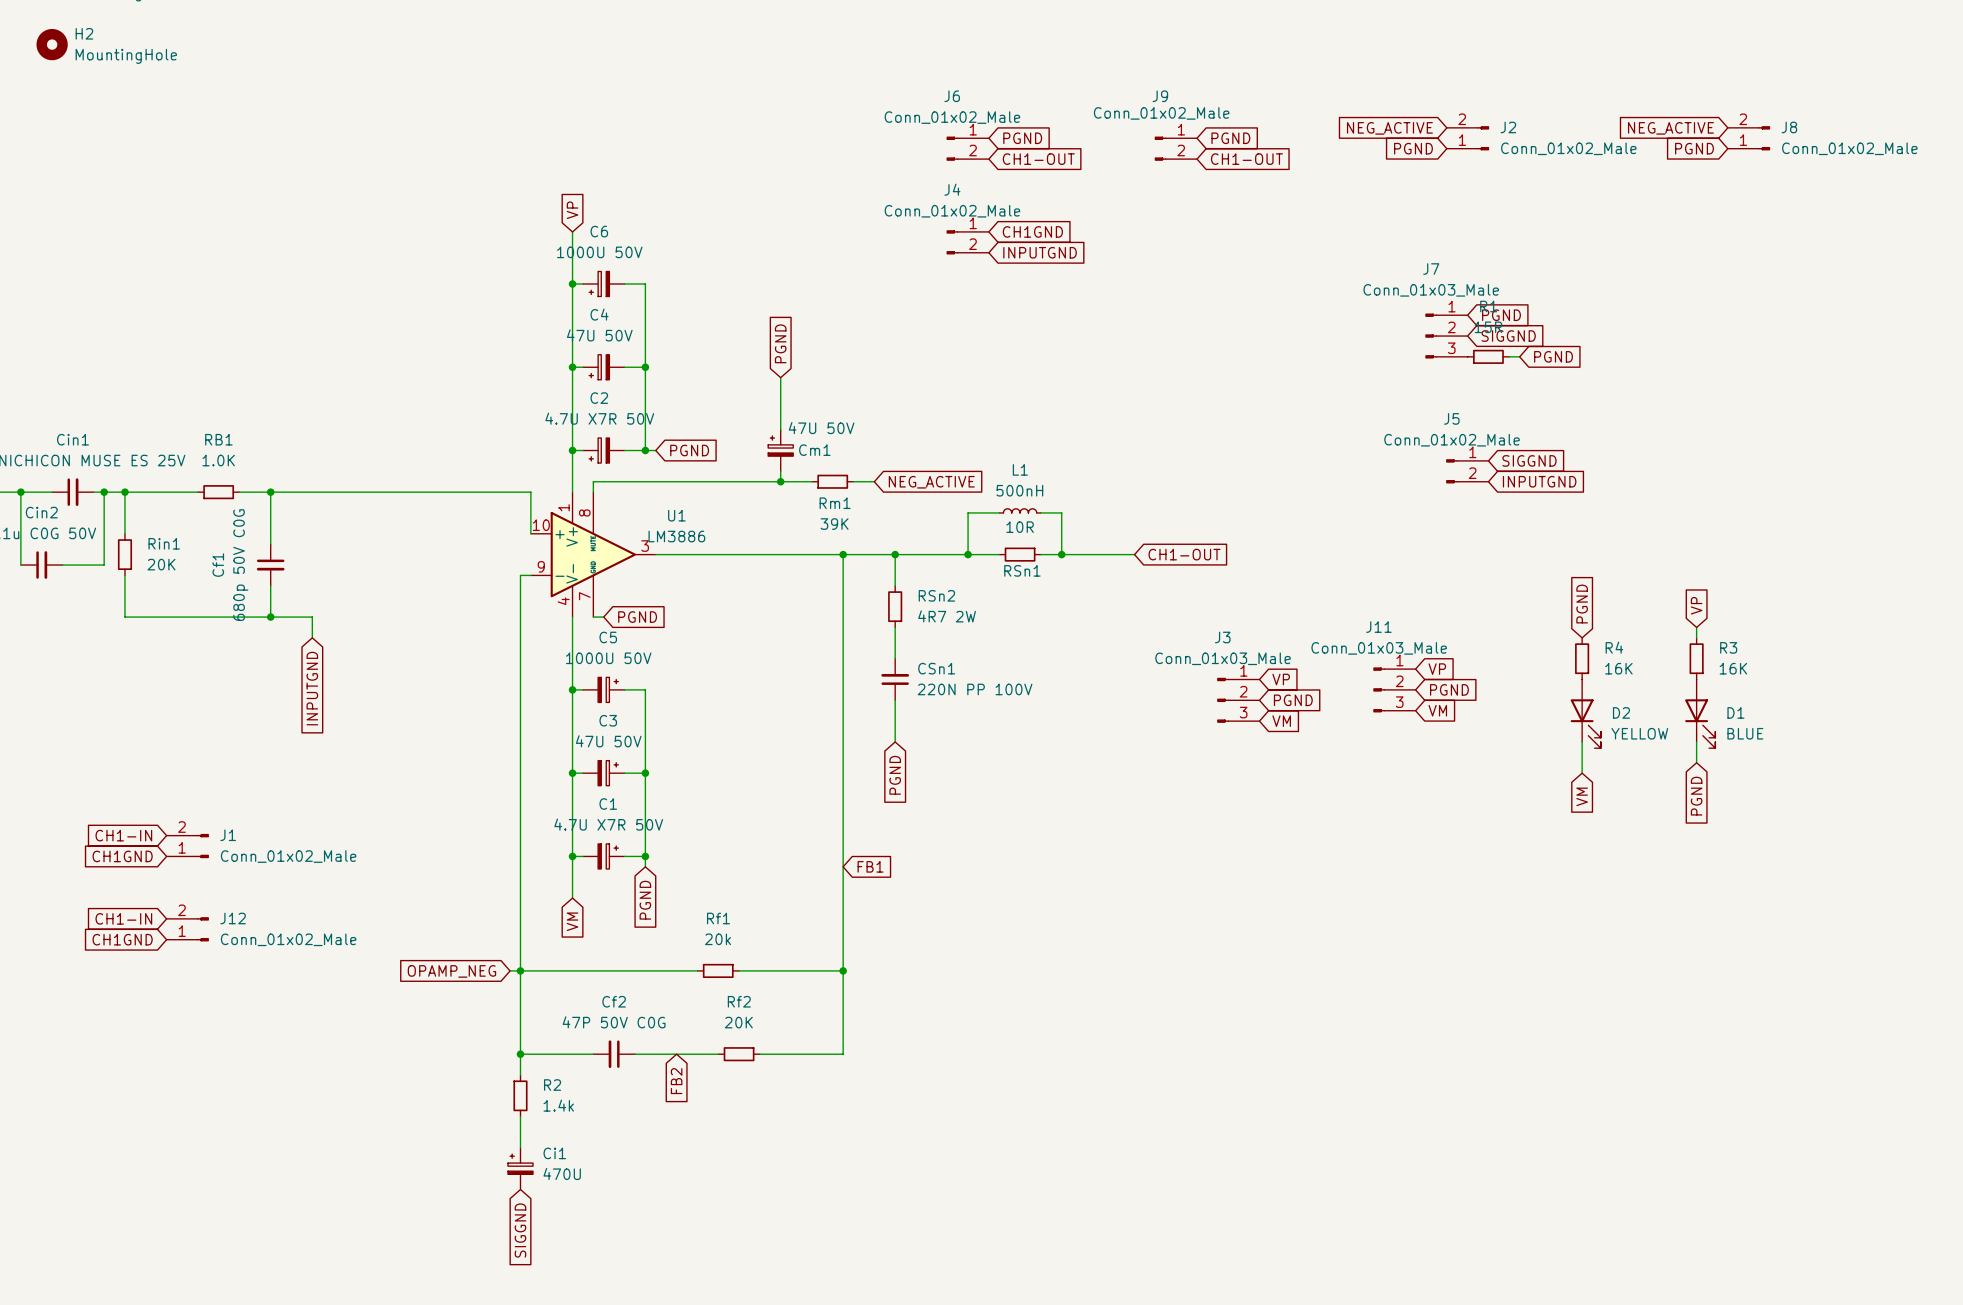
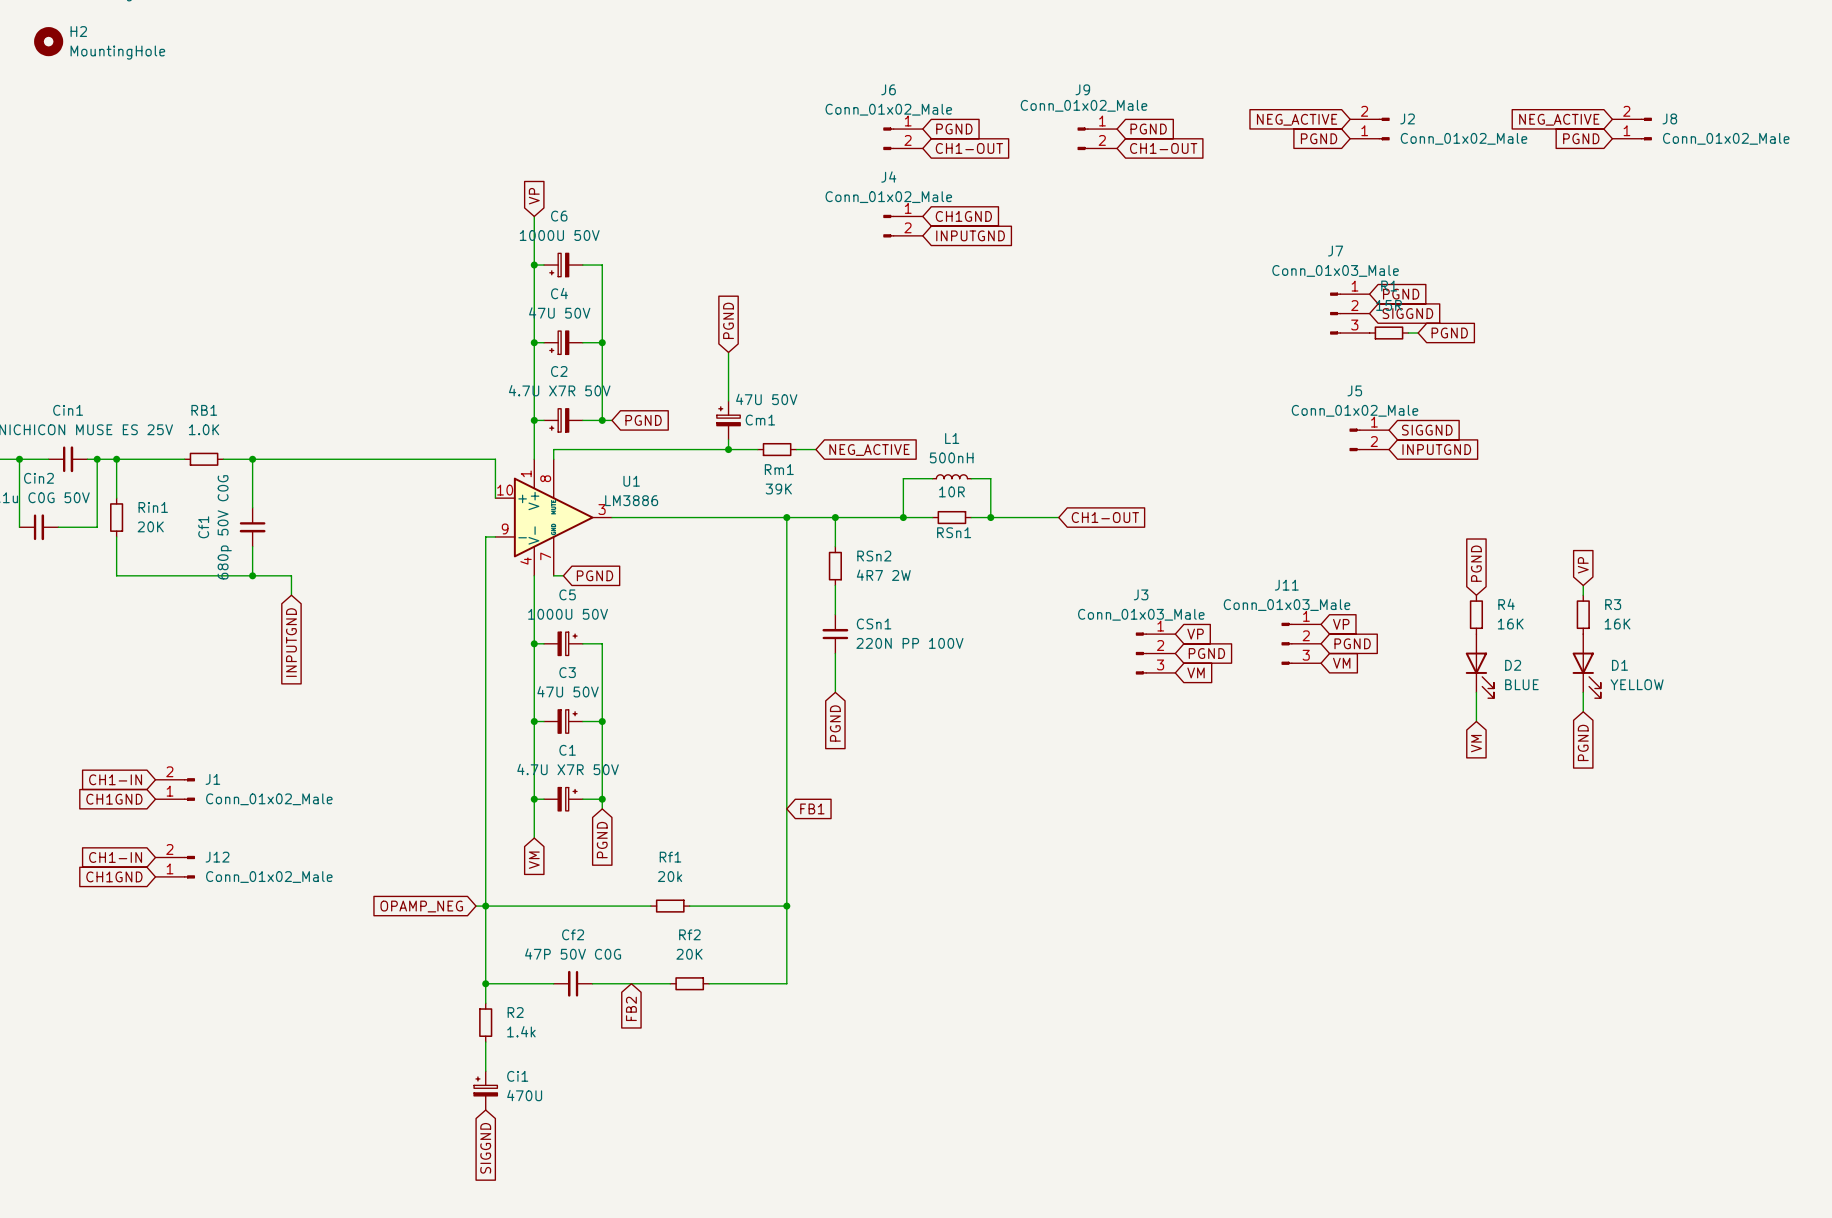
D2 value: YELLOW (1639, 733) -> BLUE (1521, 684)
D1 value: BLUE (1745, 733) -> YELLOW (1637, 684)

